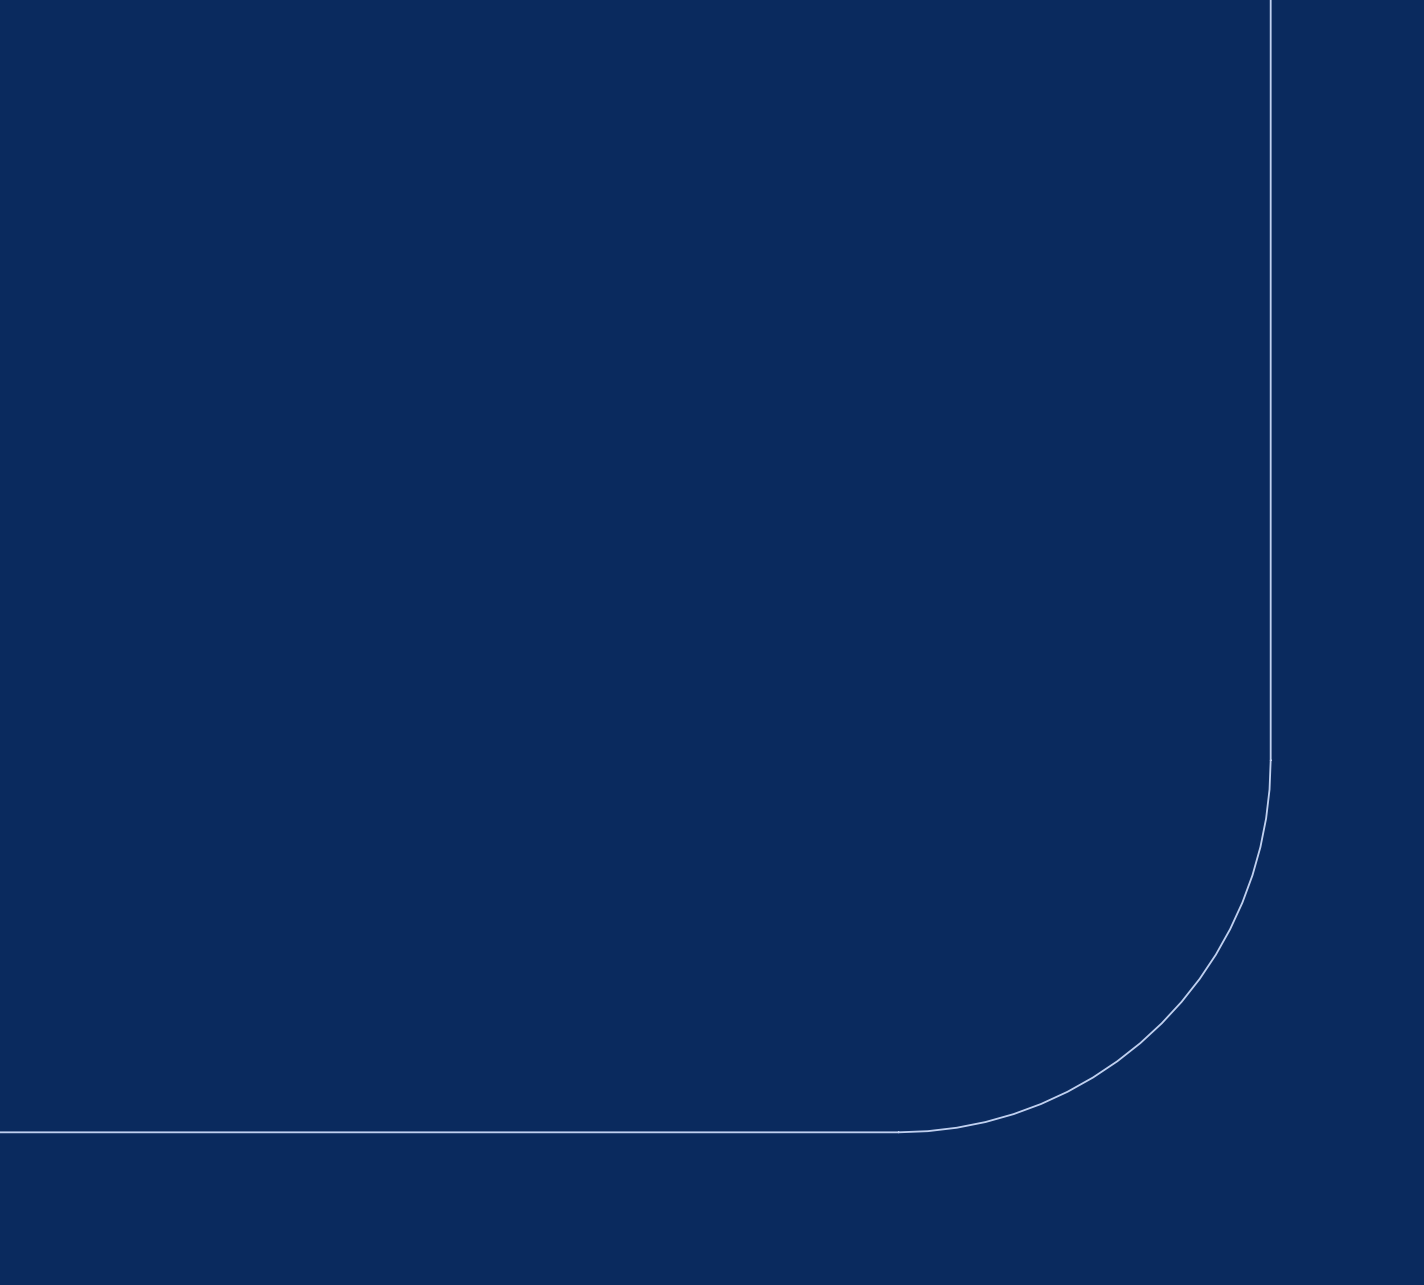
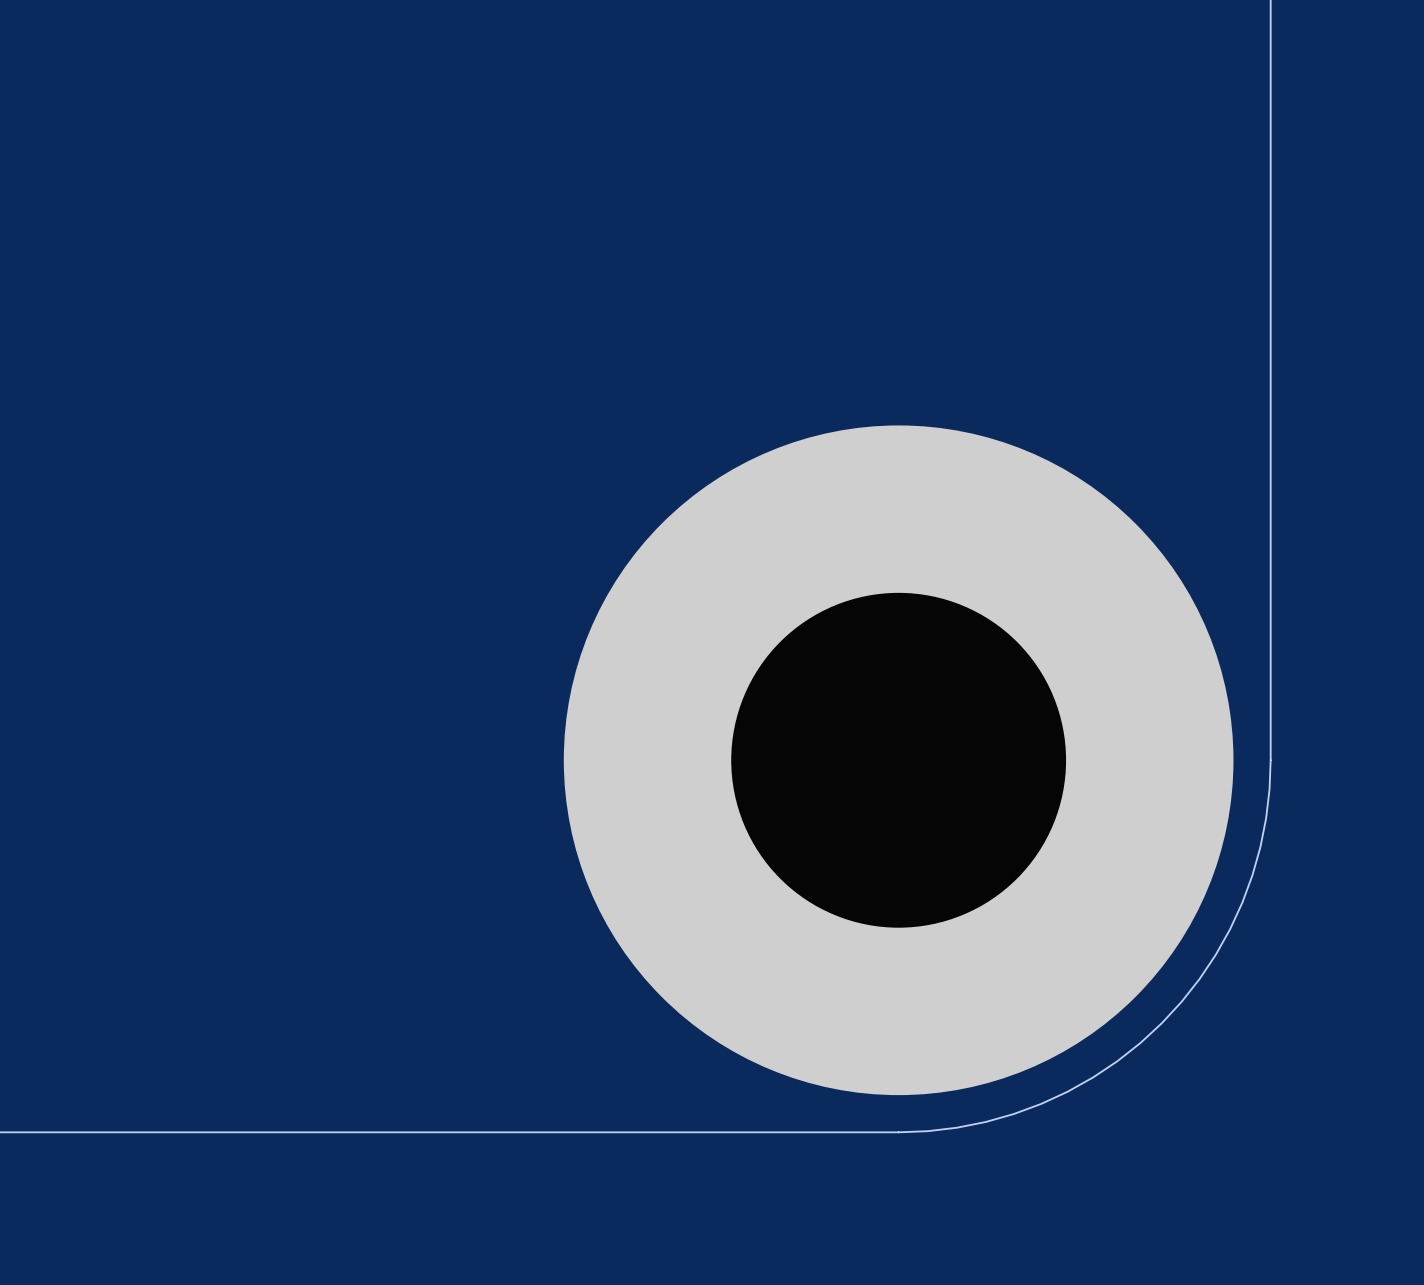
part: none -> (898, 760)

